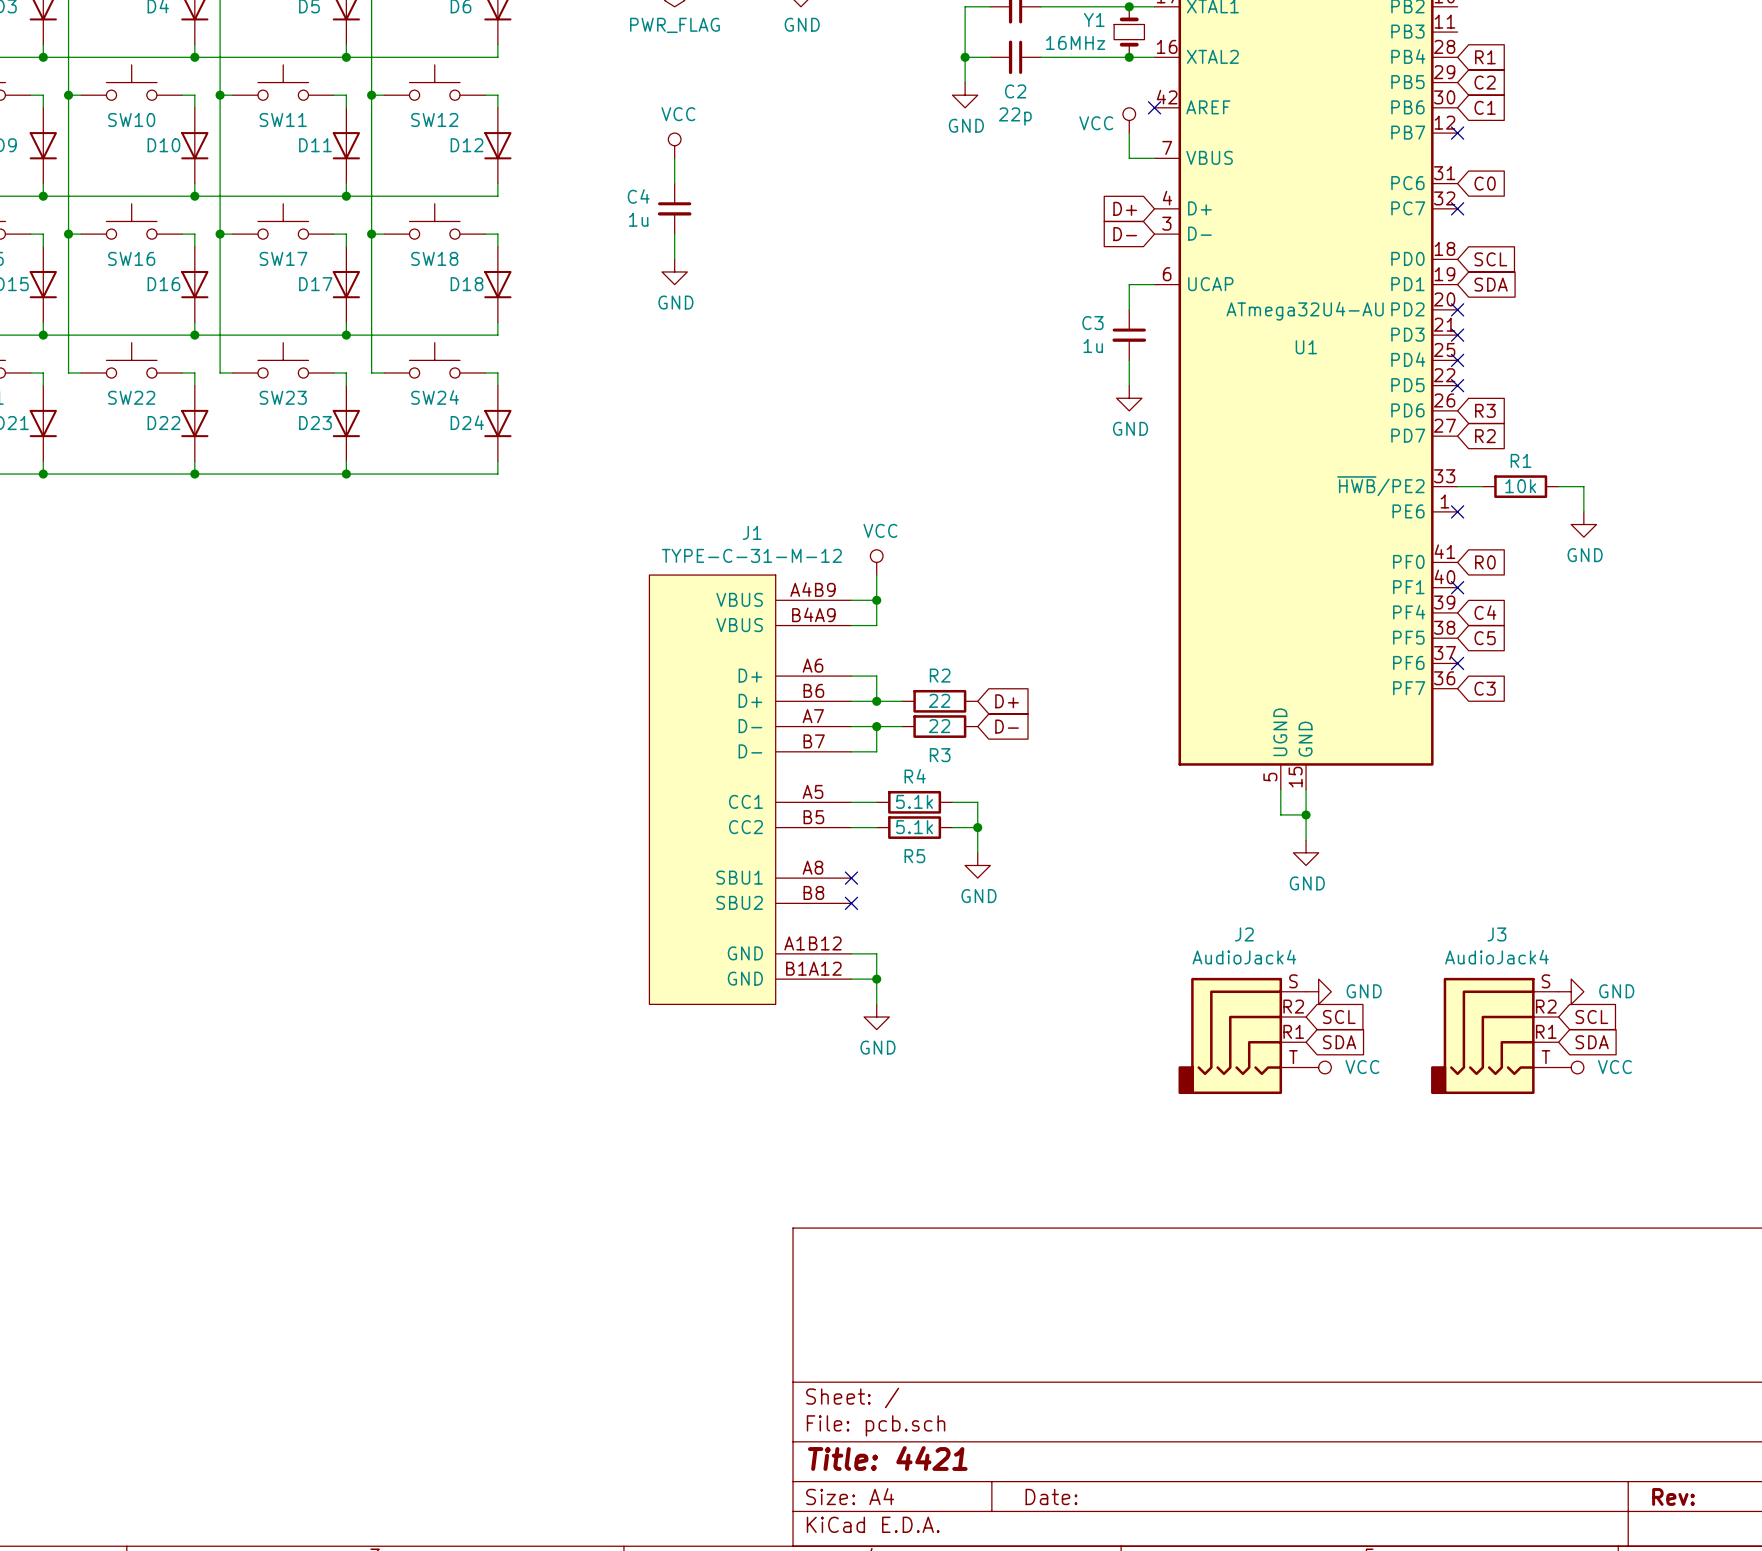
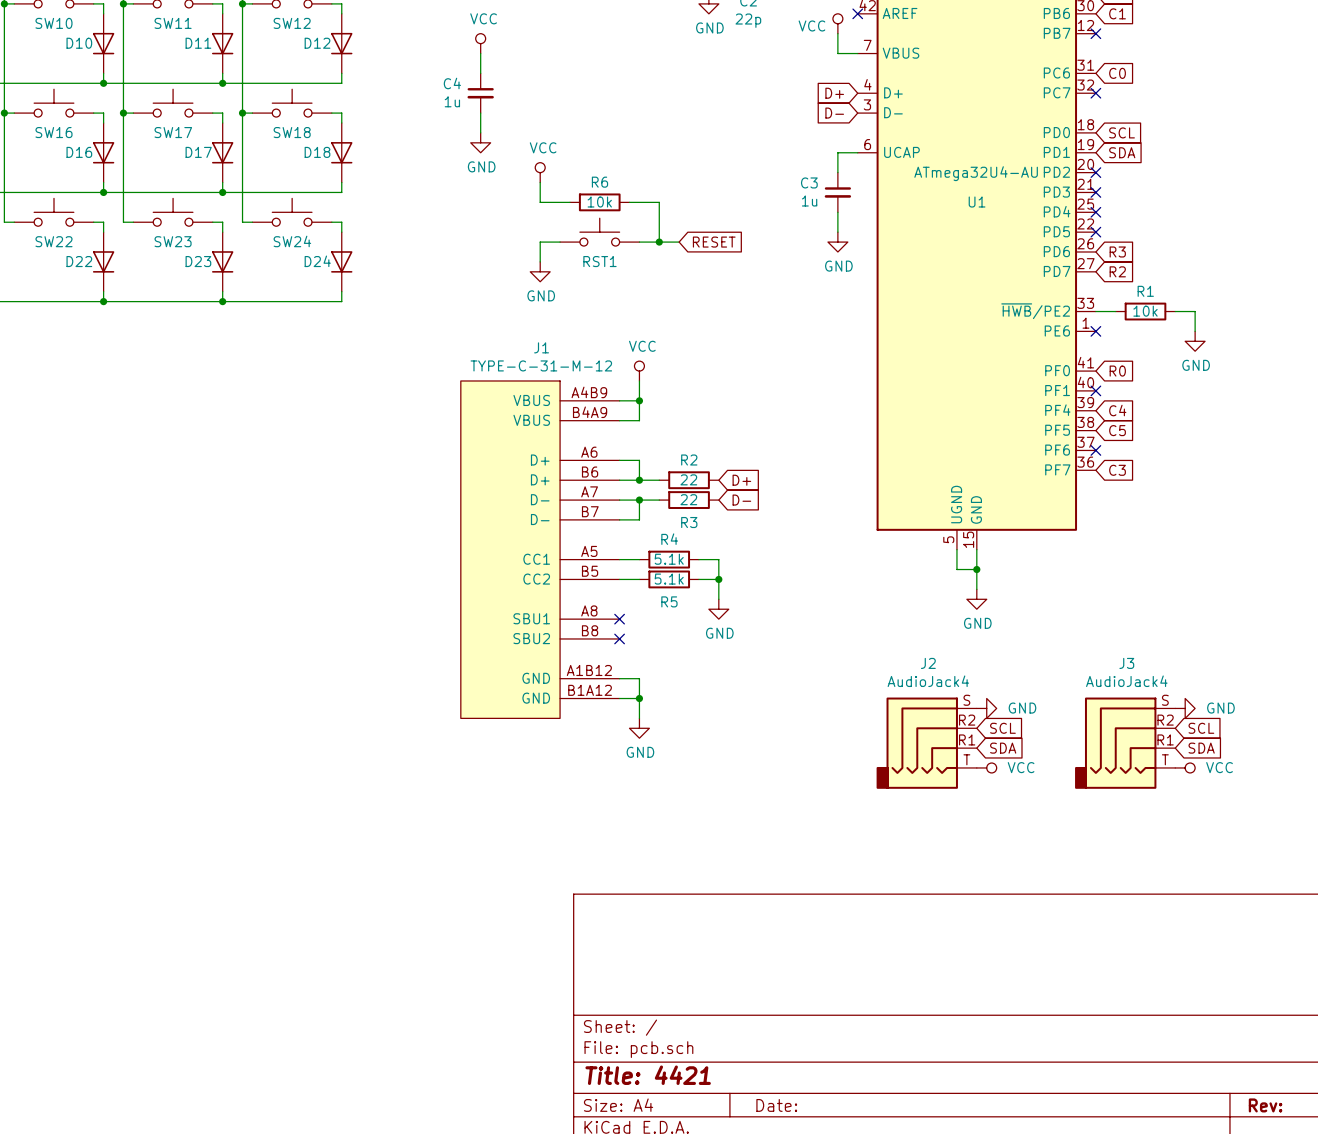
power symbol: none -> VCC (540, 172)
wire: none -> (540, 182) (540, 202) (569, 202)
R6: none -> 10k (599, 202)
wire: none -> (629, 202) (659, 202) (659, 242)
RST1: none -> (599, 232)
wire: none -> (560, 242) (540, 242) (540, 261)
wire: none -> (639, 242) (679, 242)
junction: none -> (659, 242)
global label: none -> RESET (714, 242)
power symbol: none -> GND (540, 271)

